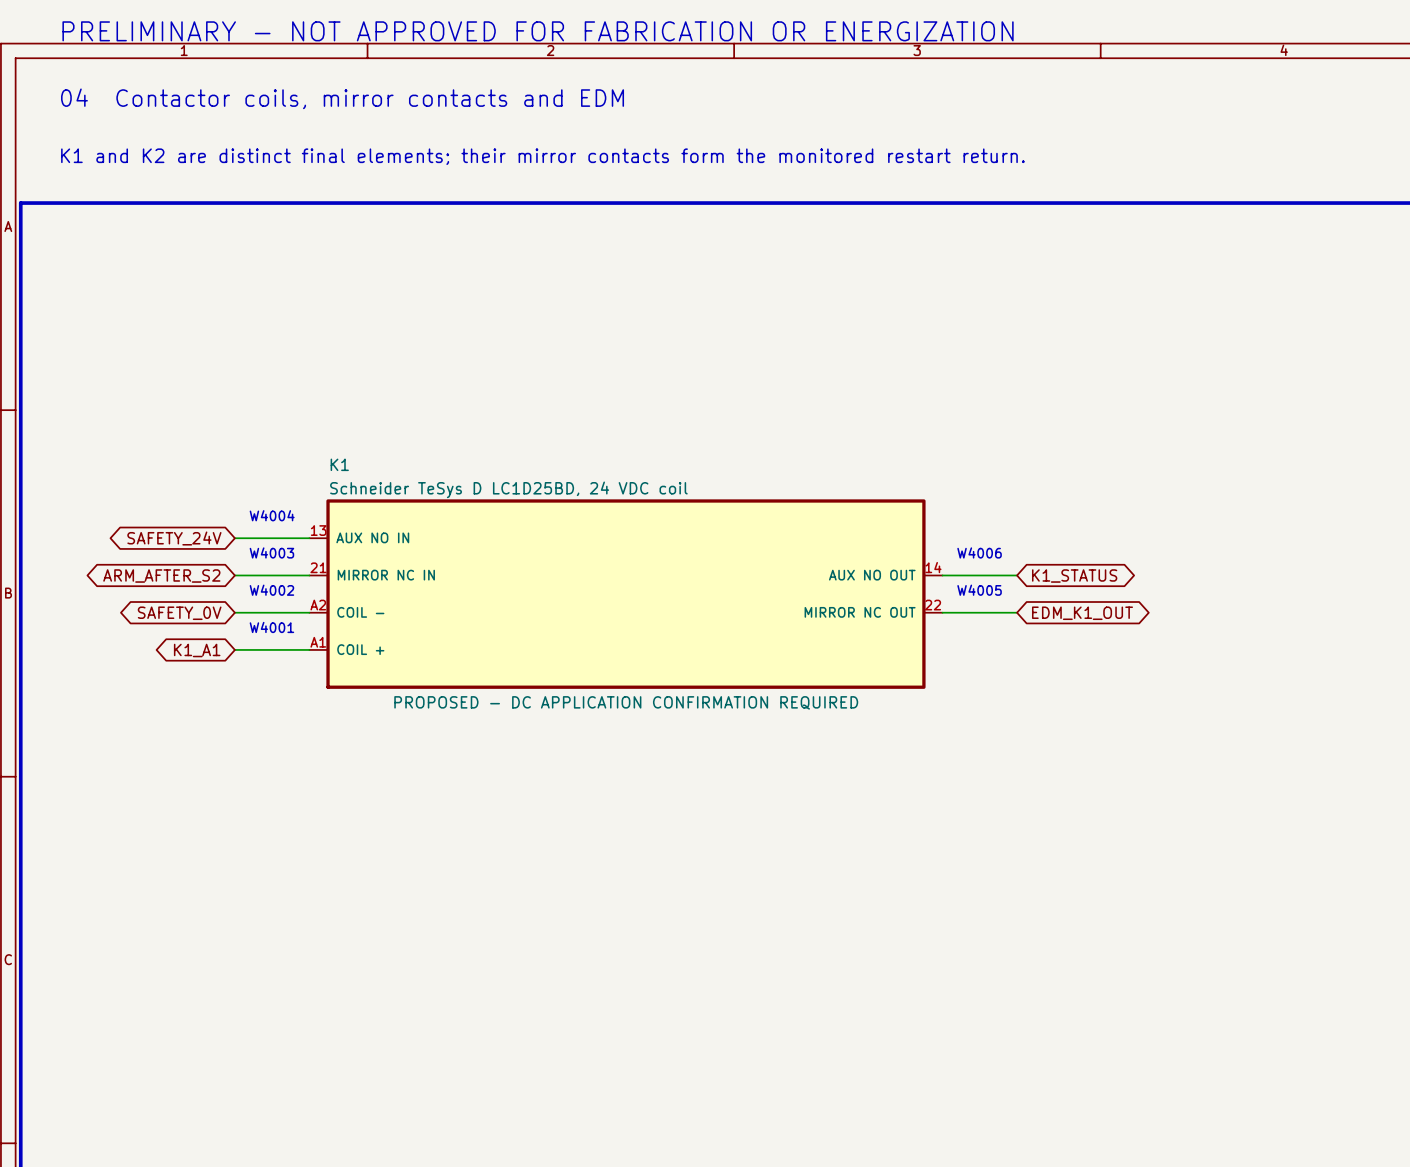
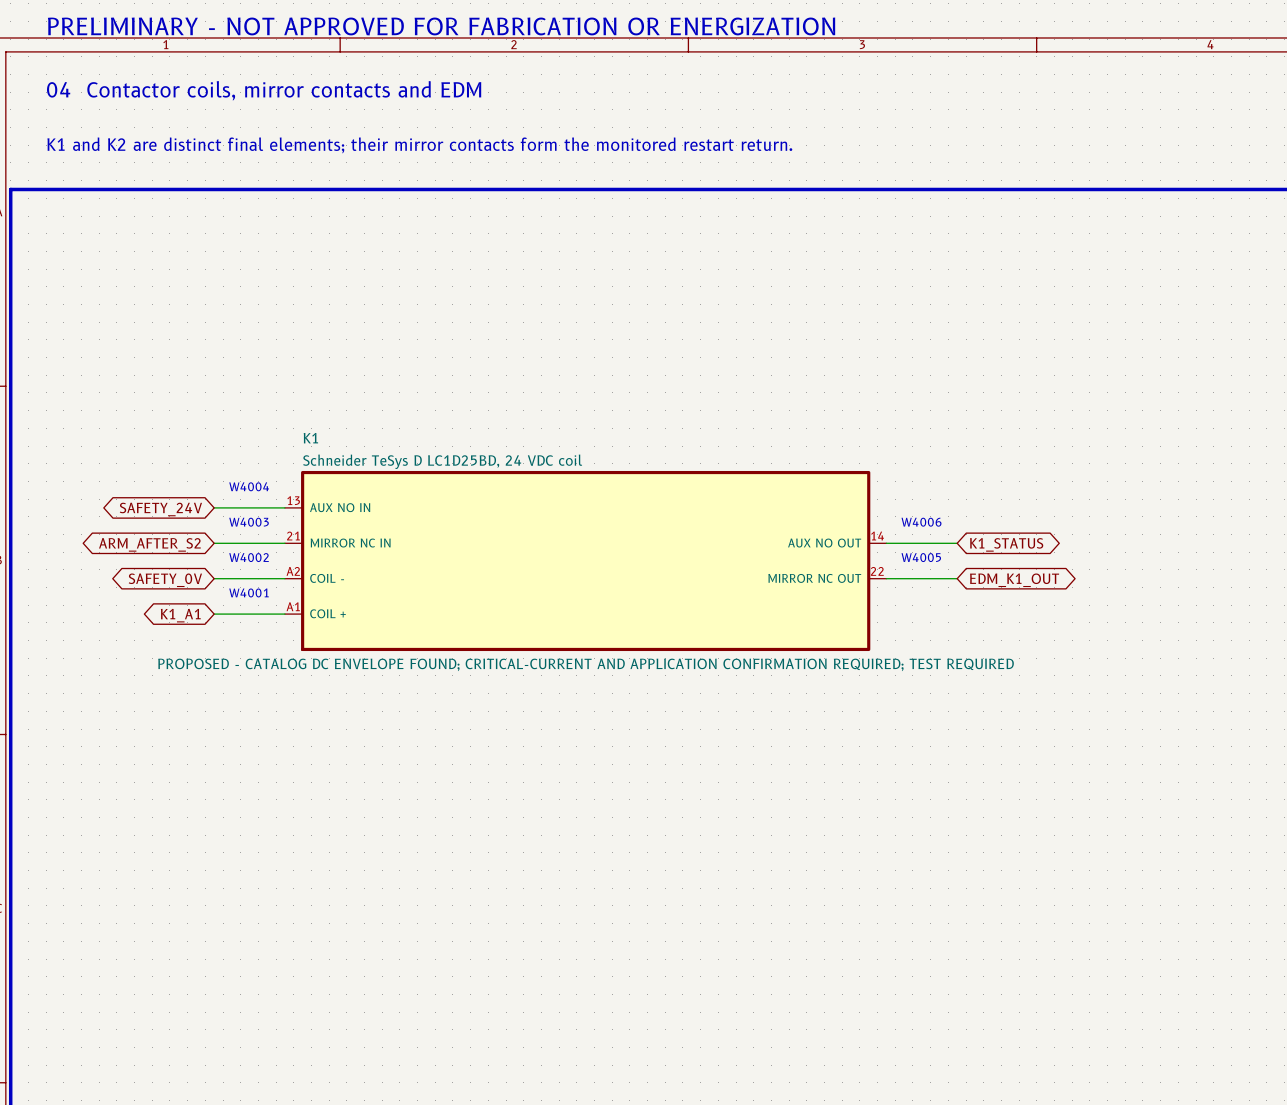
K1 text: PROPOSED - DC APPLICATION CONFIRMATION REQUIRED (626, 702) -> PROPOSED - CATALOG DC ENVELOPE FOUND; CRITICAL-CURRENT AND APPLICATION CONFIRMATION REQUIRED; TEST REQUIRED (586, 664)

